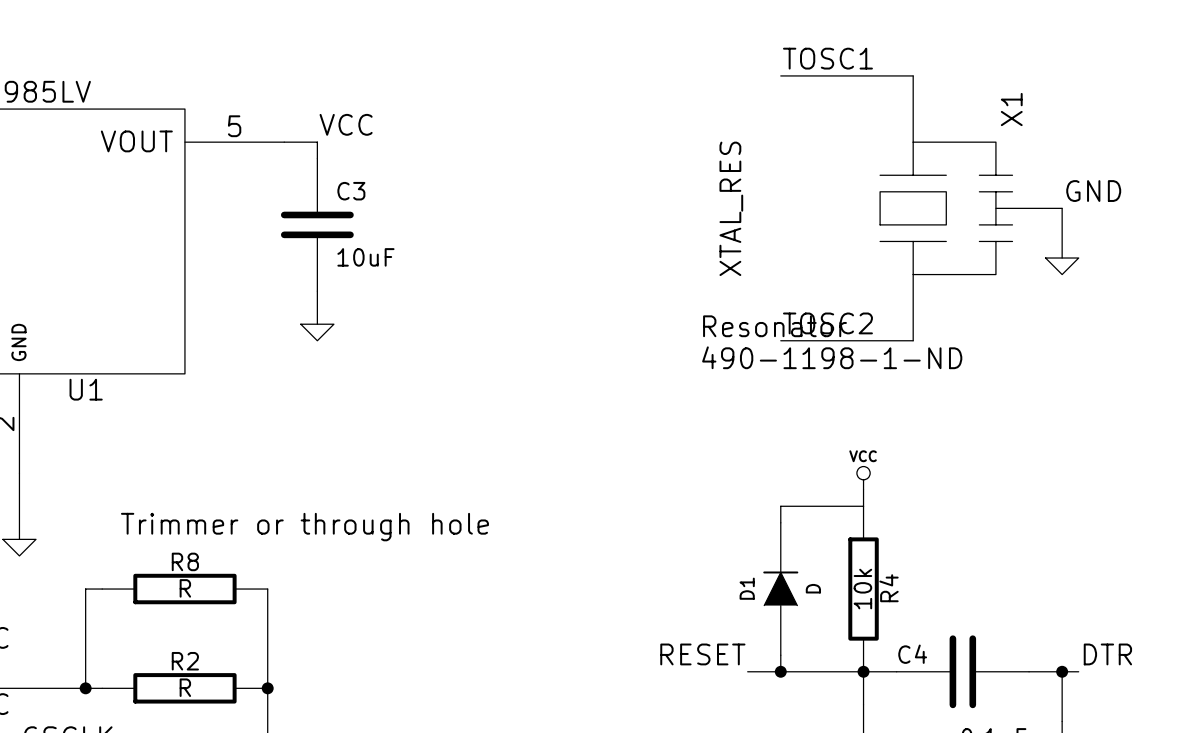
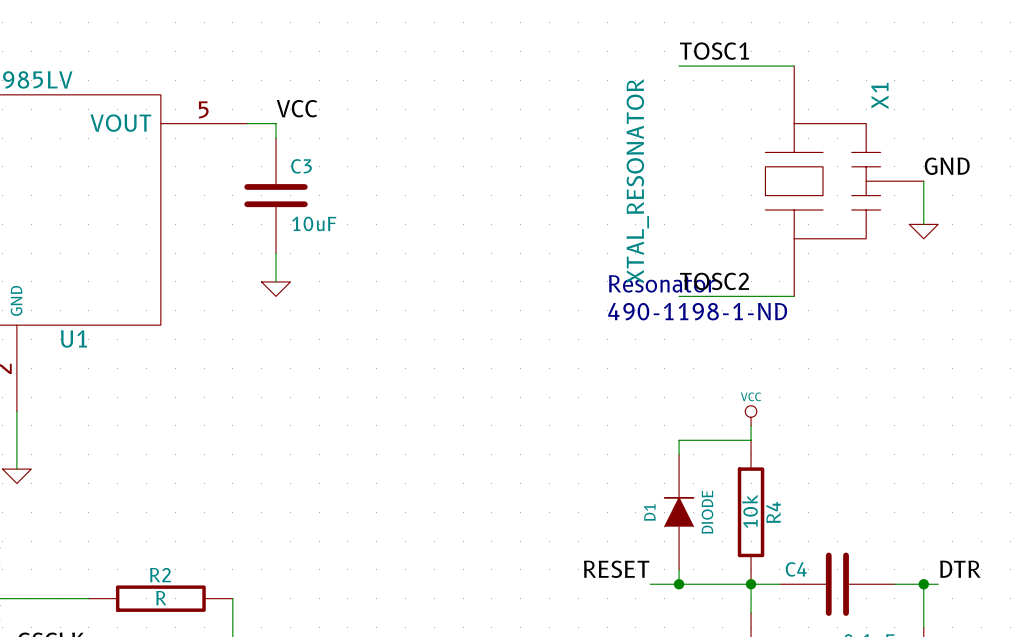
X1 value: XTAL_RES (731, 208) -> XTAL_RESONATOR (637, 181)
text: Trimmer or through hole (304, 527) -> none
D1 value: D (813, 588) -> DIODE (707, 512)
wire: (102, 589) (85, 589) (85, 688) -> none
R8: R (184, 589) -> none
wire: (267, 589) (267, 688) -> none
junction: (85, 688) -> none
junction: (267, 688) -> none

